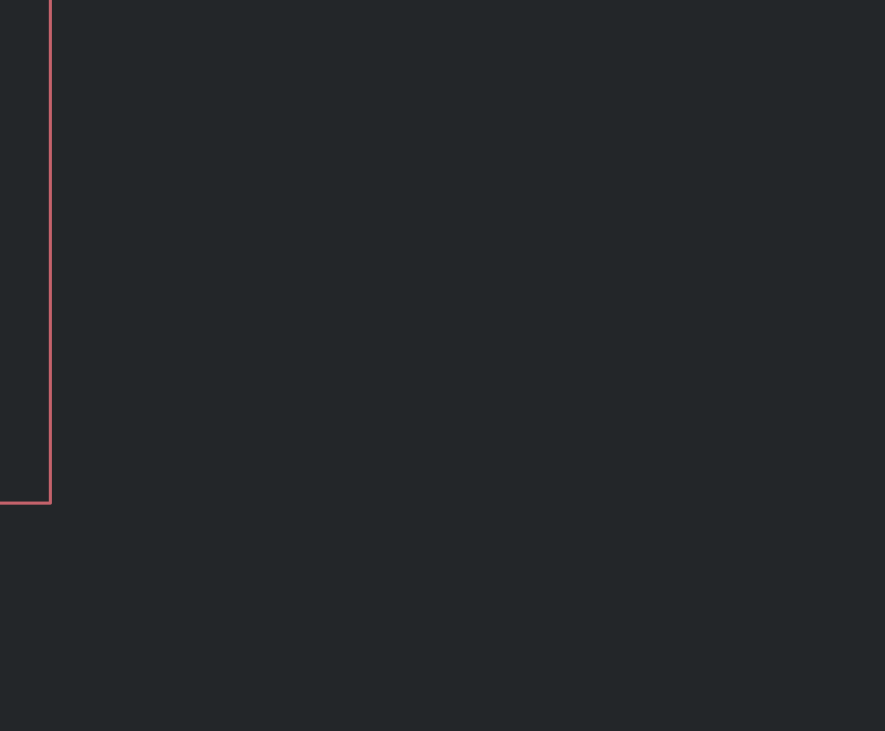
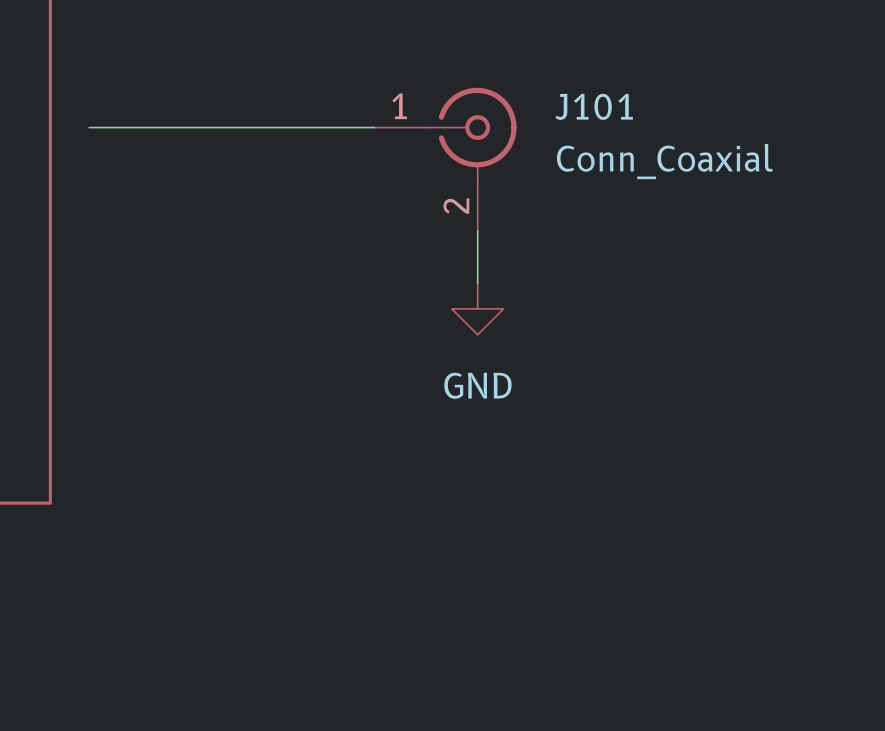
wire: none -> (89, 127) (374, 127)
J101: none -> Conn_Coaxial (445, 159)
wire: none -> (477, 231) (477, 282)
power symbol: none -> GND (477, 308)

